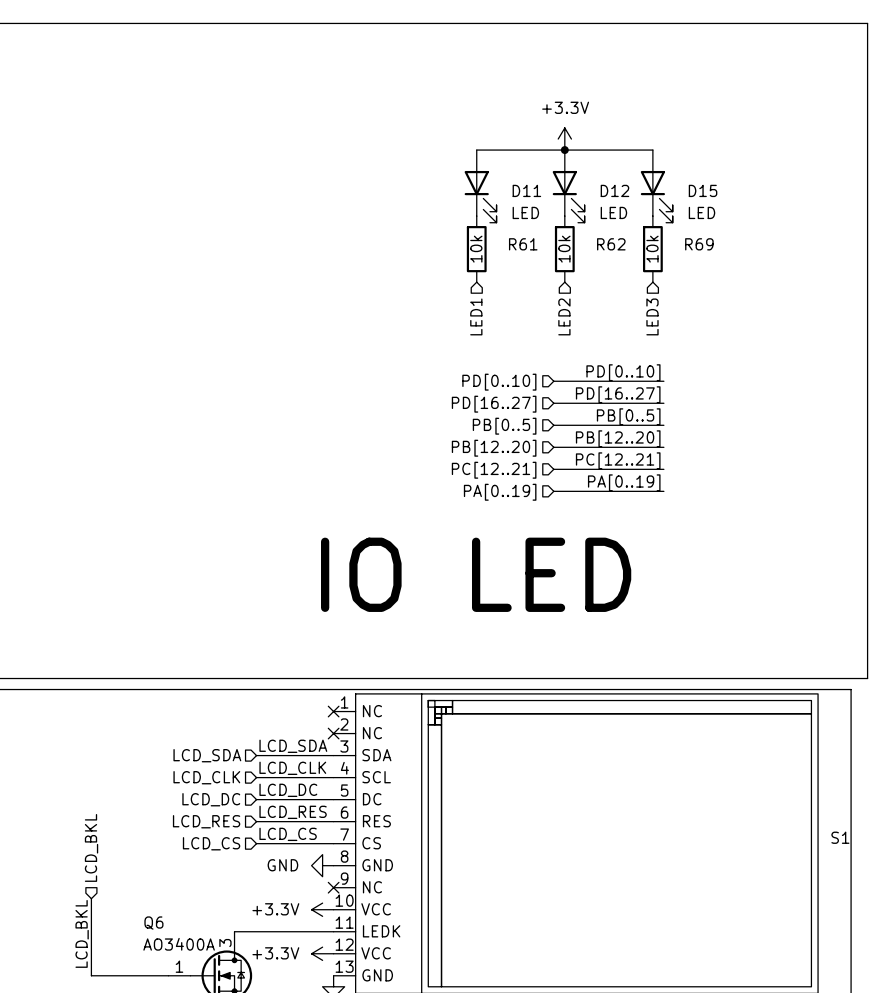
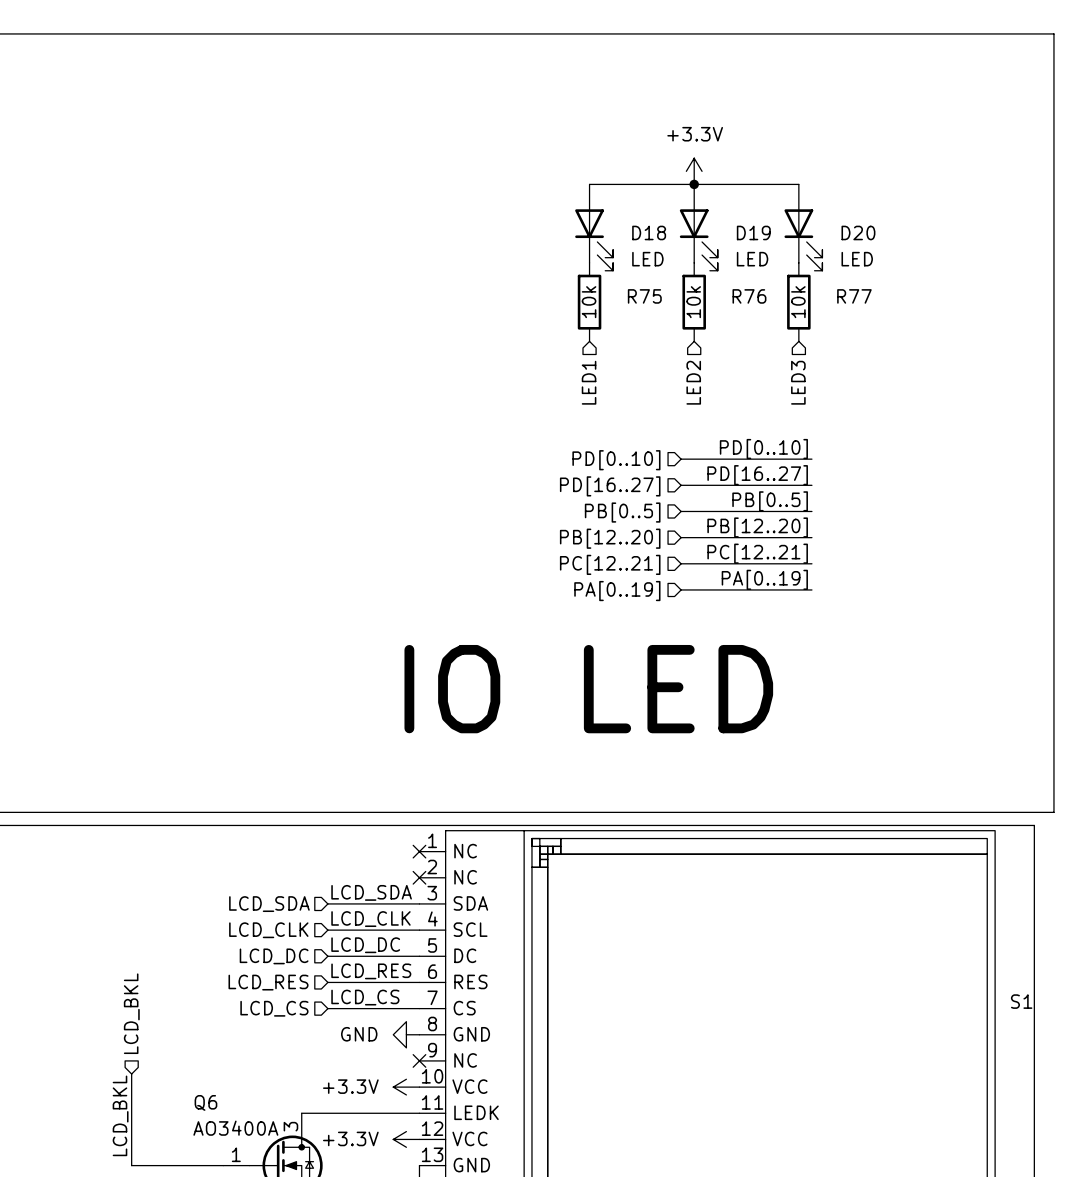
D11 name: D11 (526, 190) -> D18 (649, 232)
D12 name: D12 (614, 190) -> D19 (753, 232)
D15 name: D15 (703, 190) -> D20 (858, 232)
R61 name: R61 (523, 244) -> R75 (644, 296)
R62 name: R62 (611, 244) -> R76 (749, 296)
R69 name: R69 (699, 244) -> R77 (854, 296)

